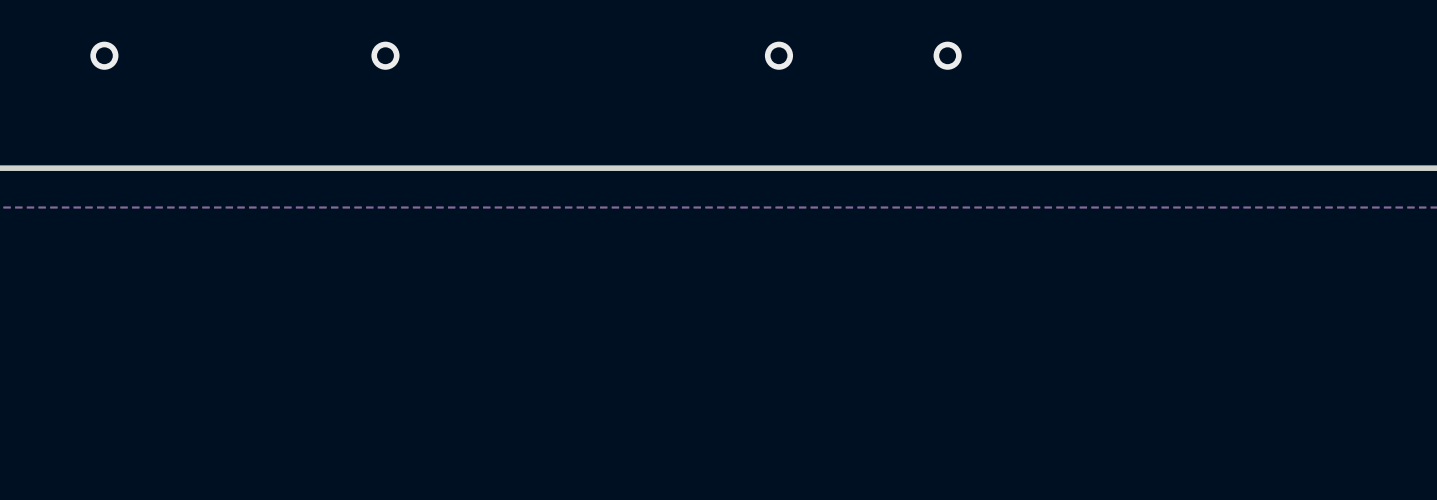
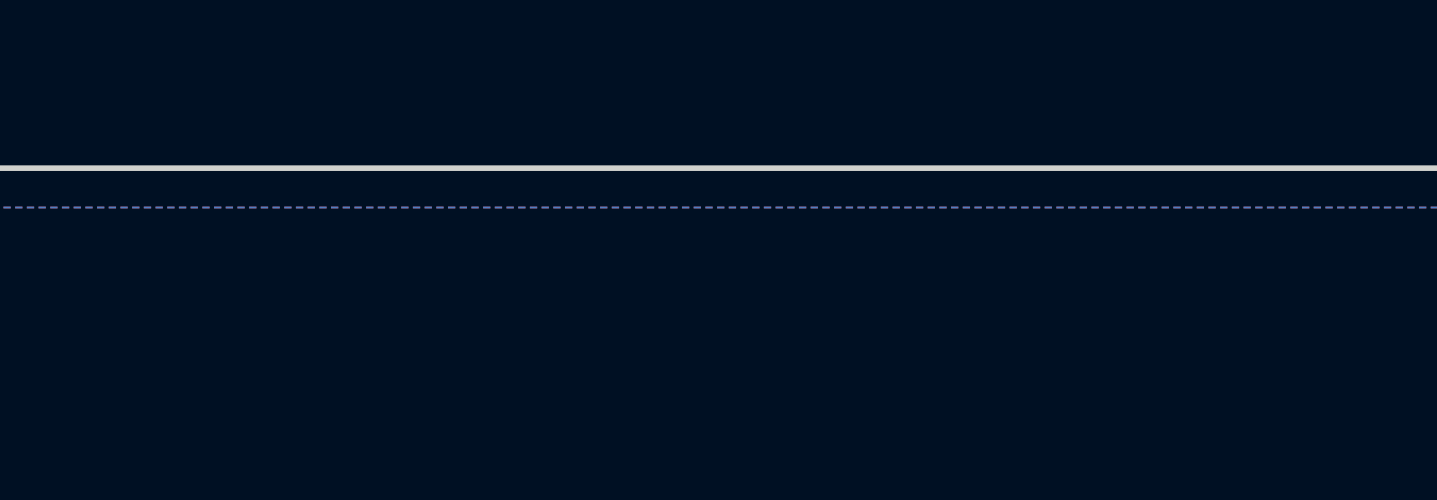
via: (104, 55) -> none
via: (385, 55) -> none
via: (778, 55) -> none
via: (947, 55) -> none

